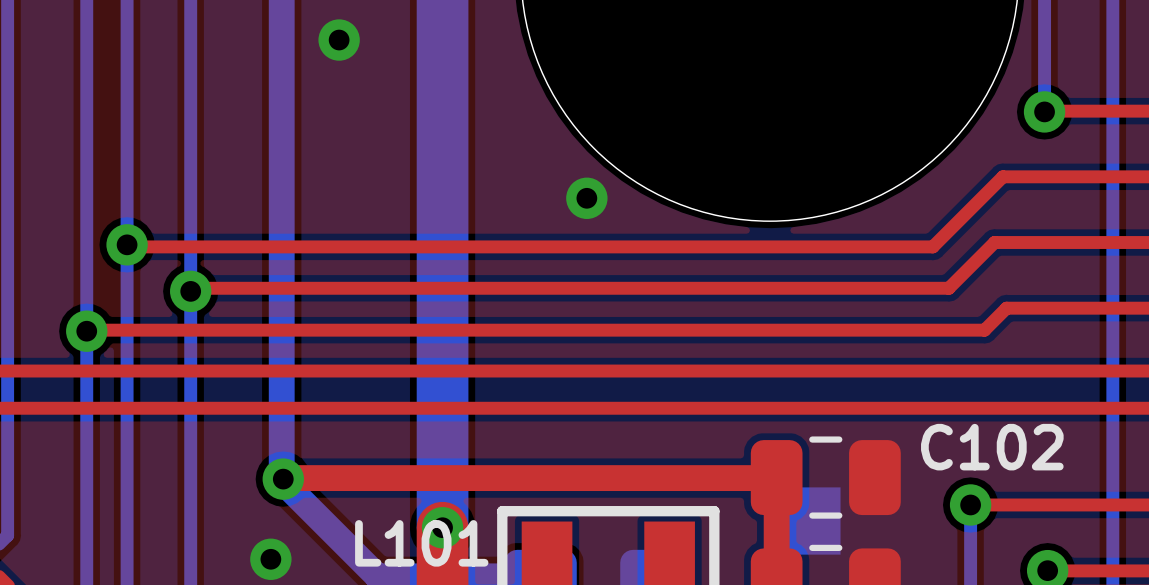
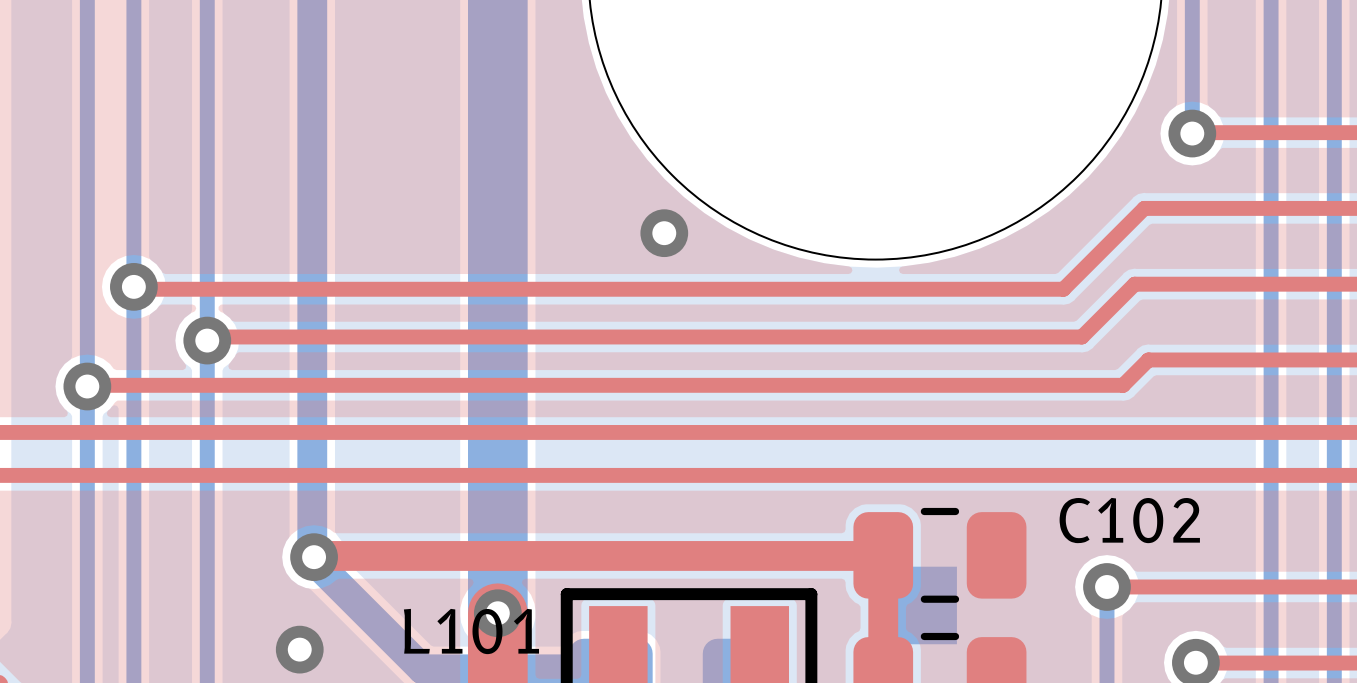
via: (339, 40) -> none

